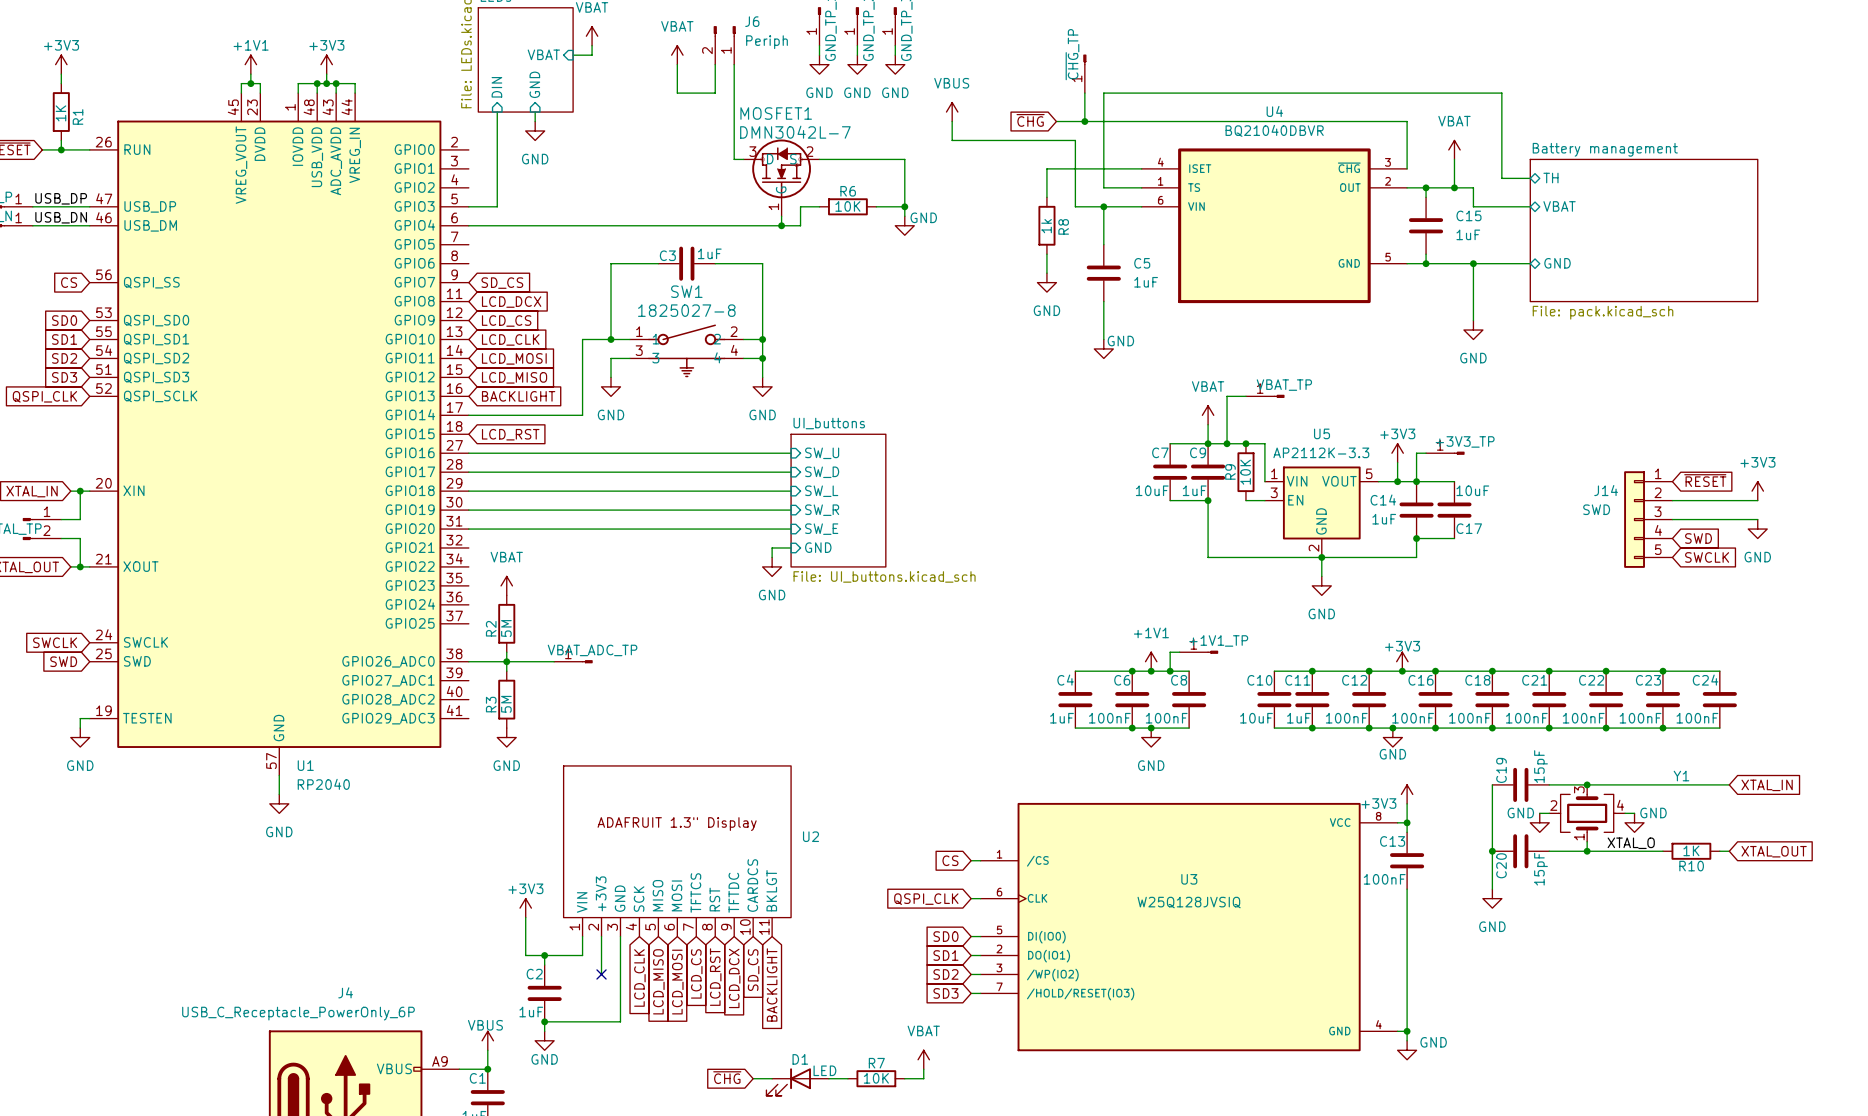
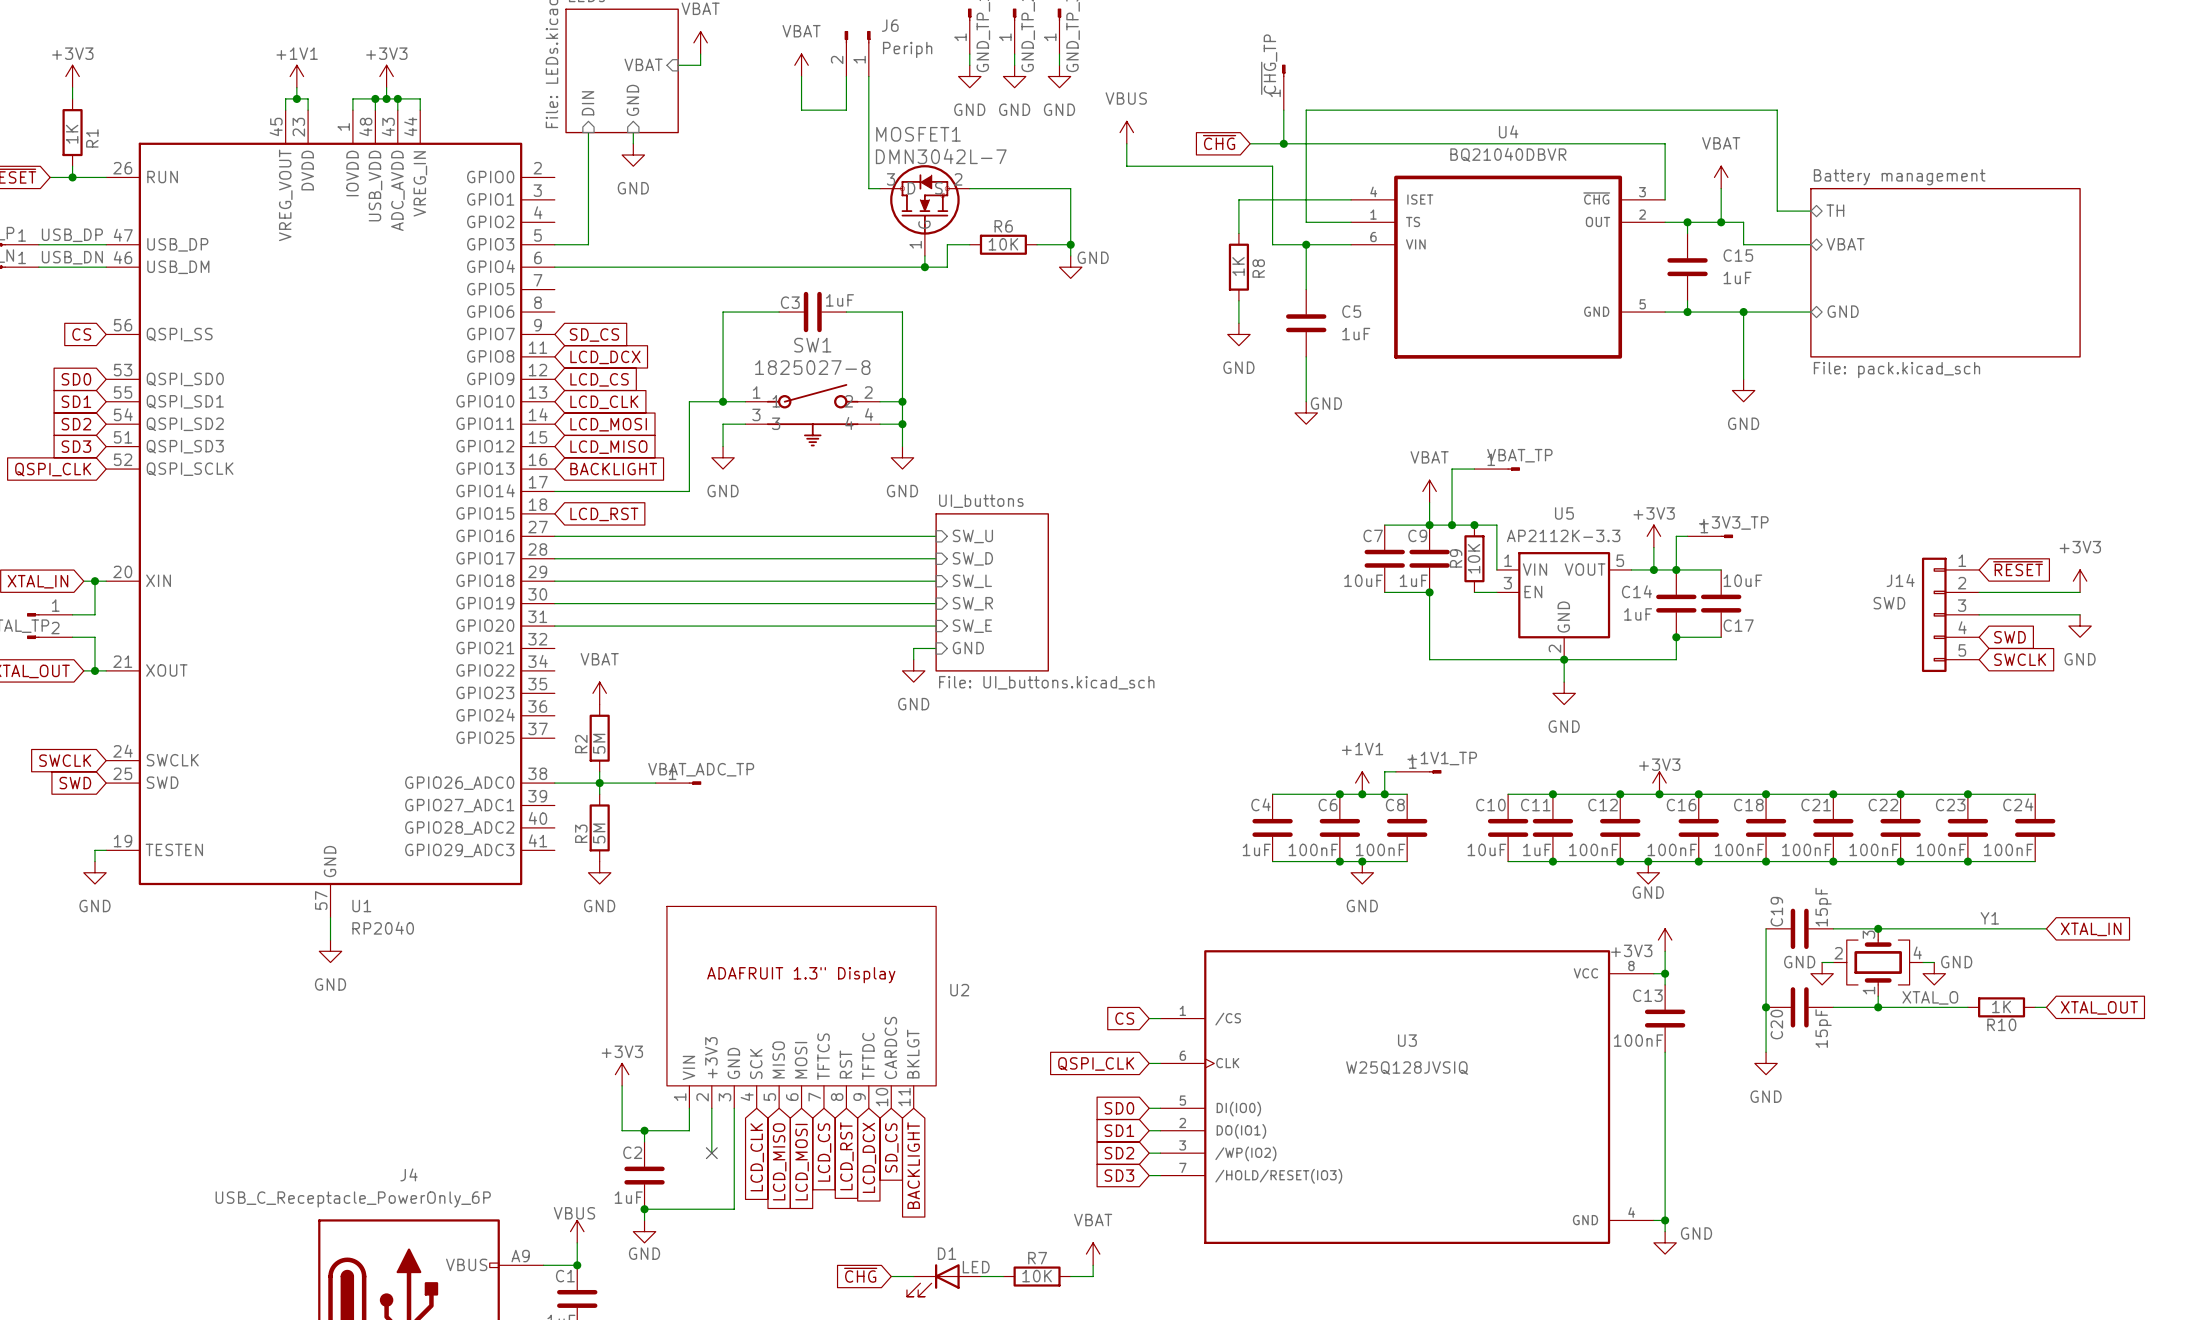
R8 value: 1k (1046, 226) -> 1K (1238, 266)

